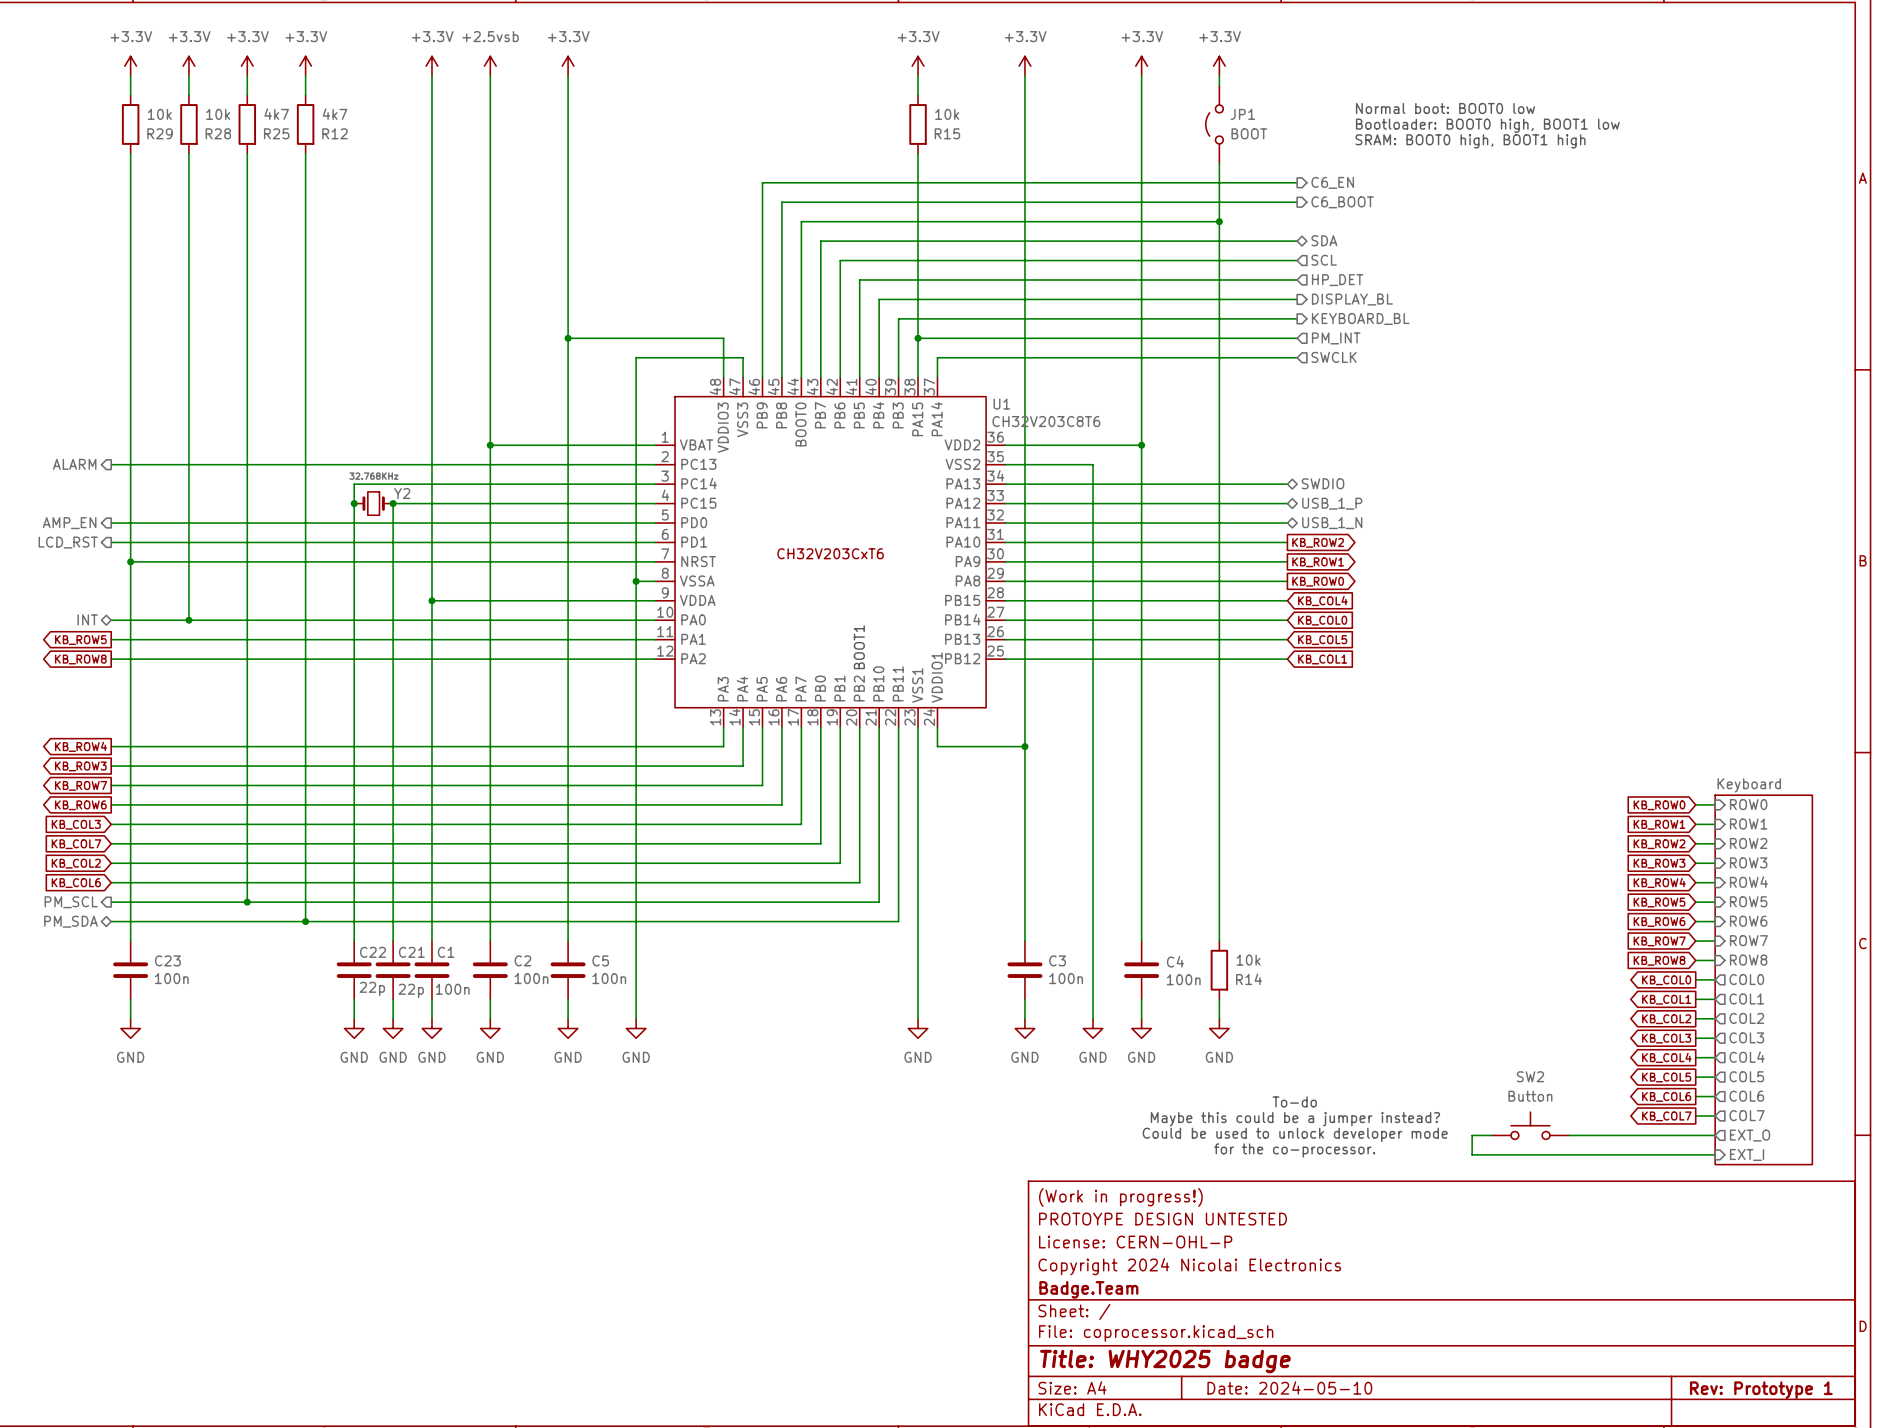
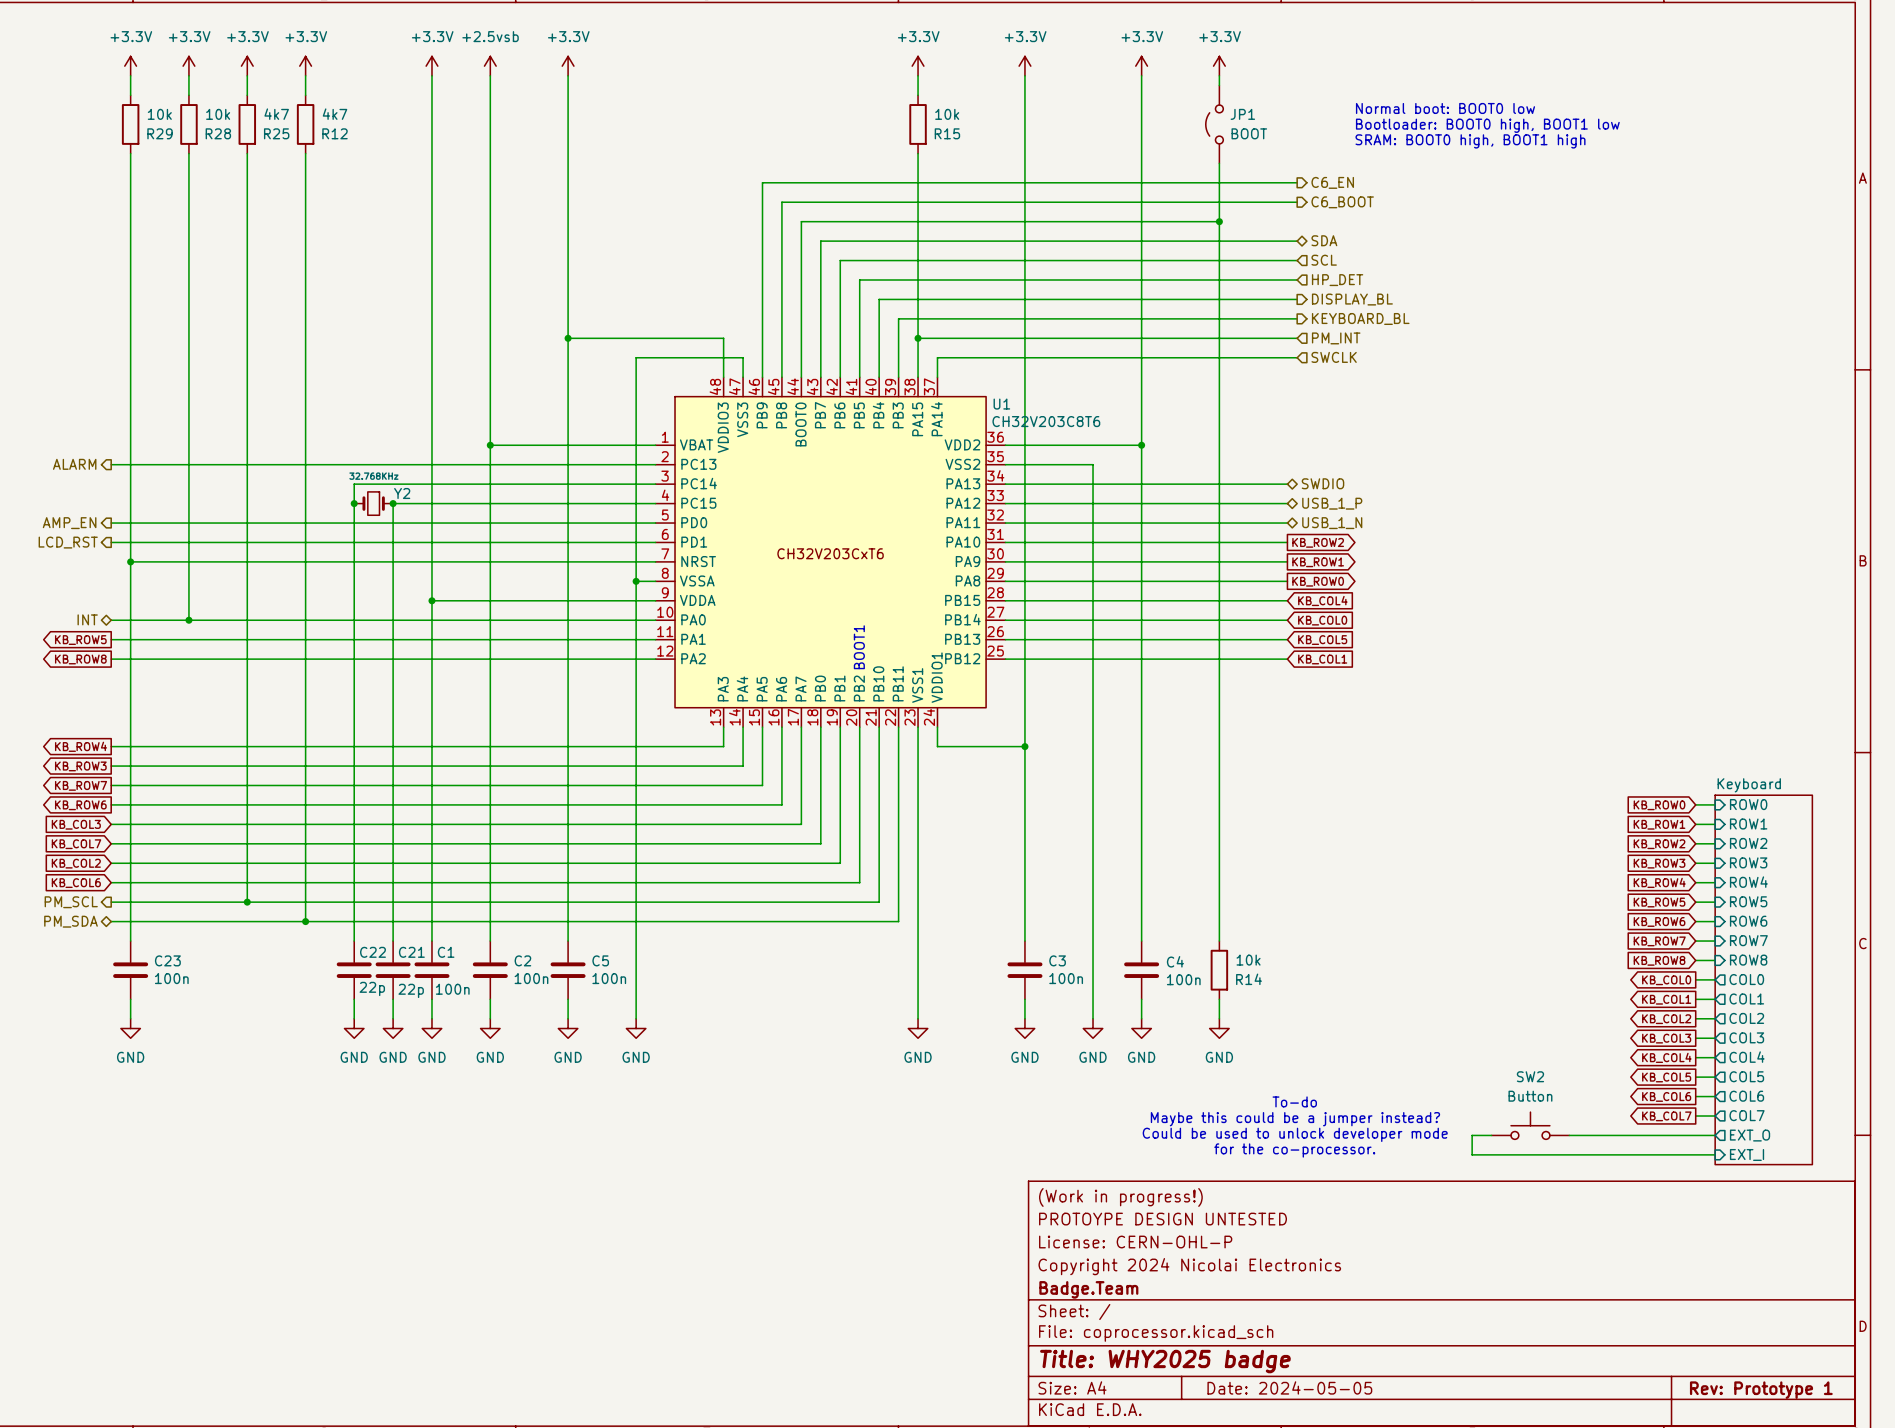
title block: Date: 2024-05-10 (1289, 1387) -> Date: 2024-05-05 (1289, 1387)

